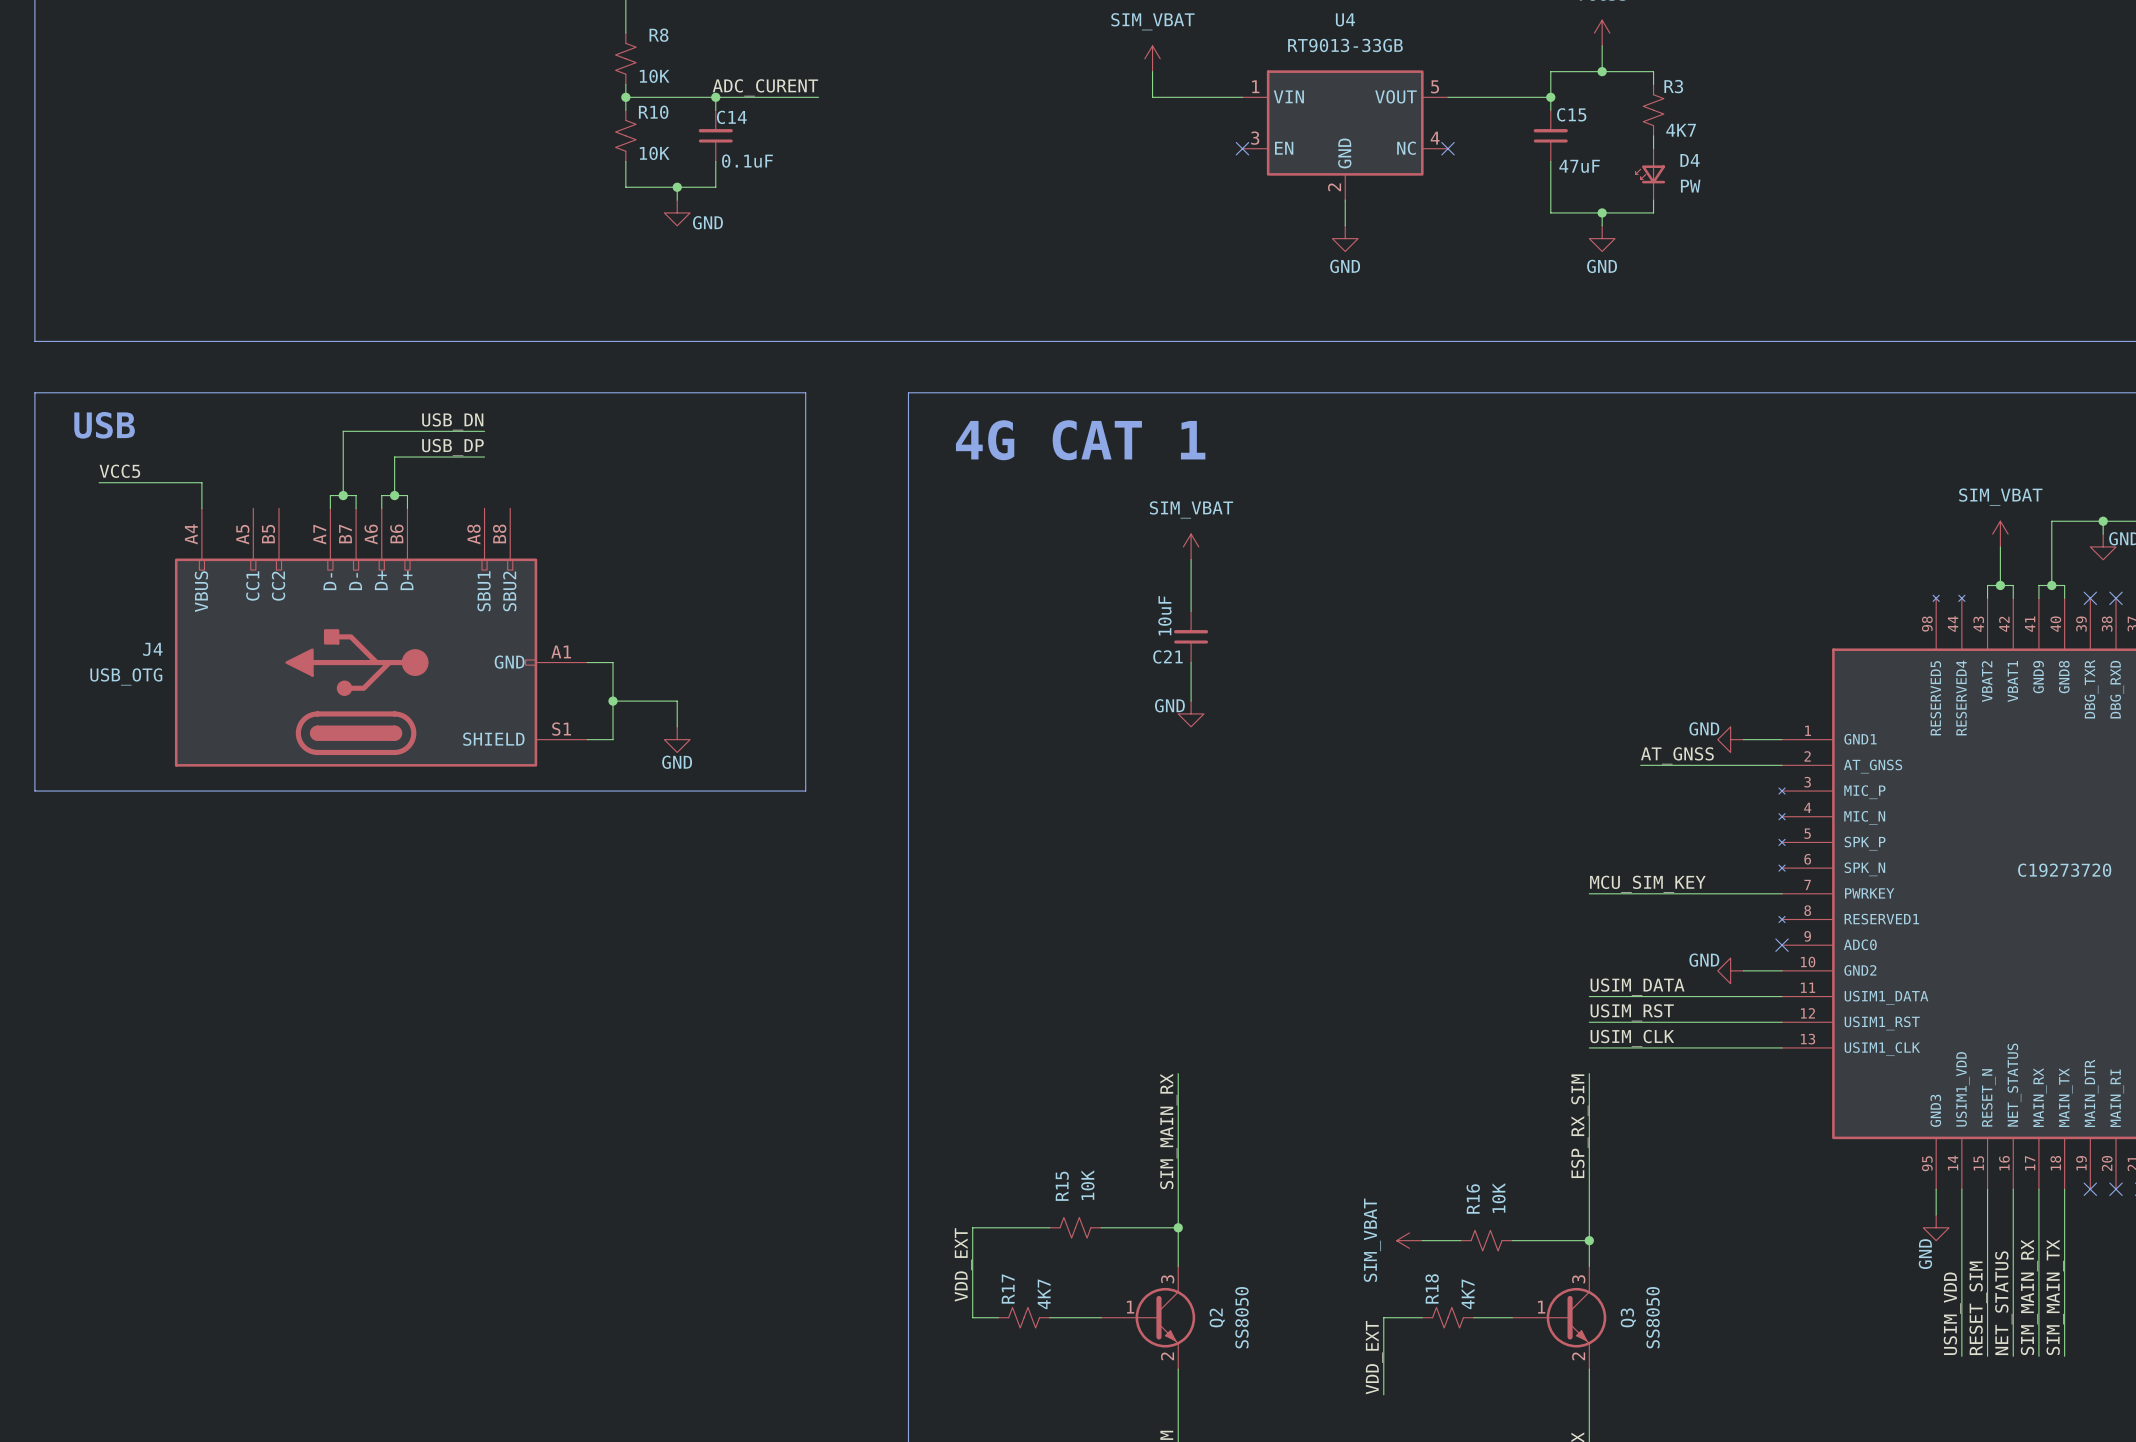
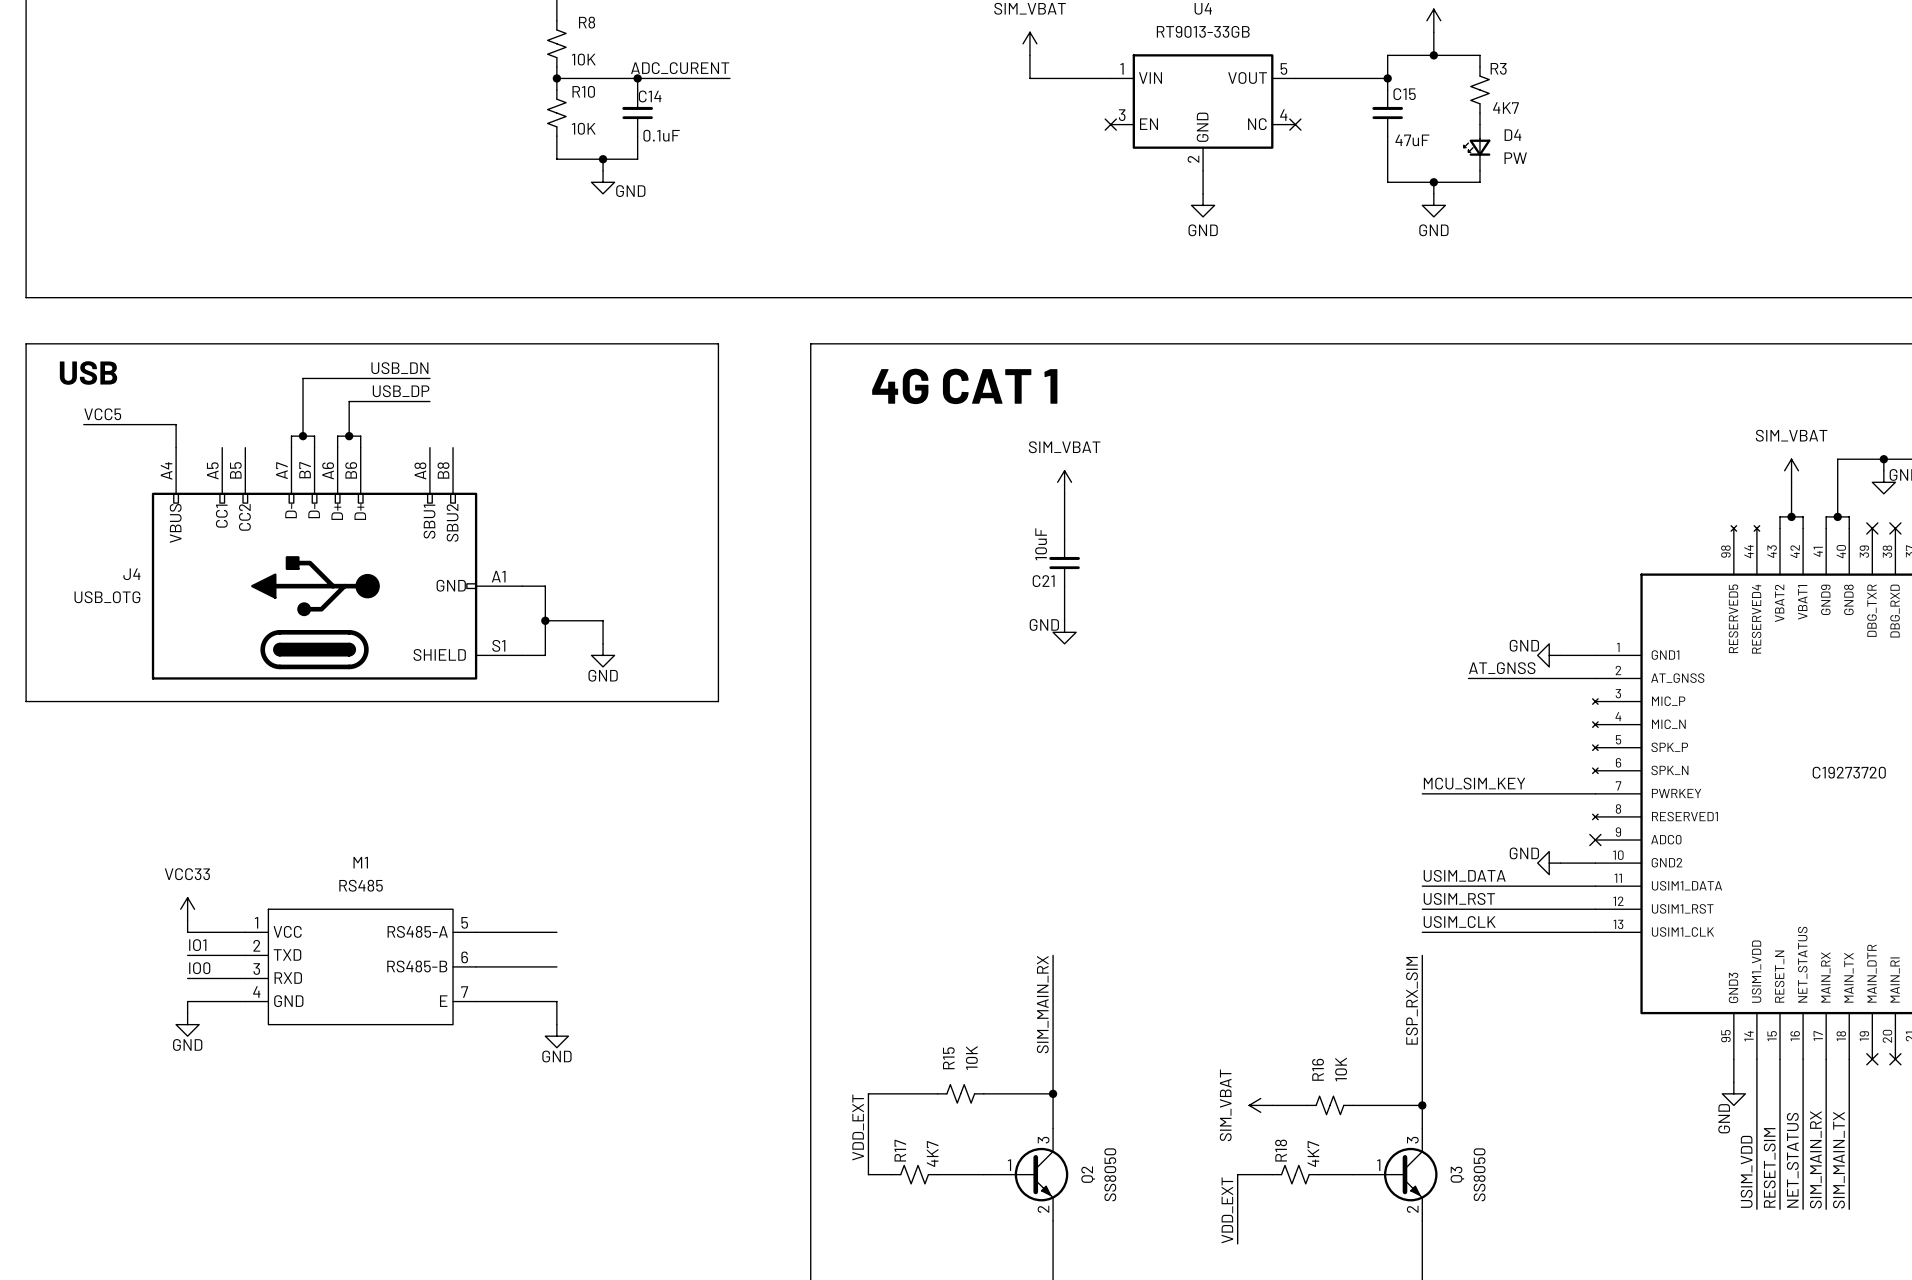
power symbol: none -> VCC33 (187, 909)
wire: none -> (187, 920) (187, 932) (245, 932)
wire: none -> (476, 932) (556, 932)
label: none -> IO1 (197, 945)
wire: none -> (187, 955) (245, 955)
M1: none -> RS485 (360, 966)
wire: none -> (476, 966) (556, 966)
label: none -> IO0 (199, 968)
wire: none -> (187, 978) (245, 978)
wire: none -> (245, 1001) (187, 1001) (187, 1013)
wire: none -> (476, 1001) (556, 1001) (556, 1024)
power symbol: none -> GND (187, 1024)
power symbol: none -> GND (556, 1036)

